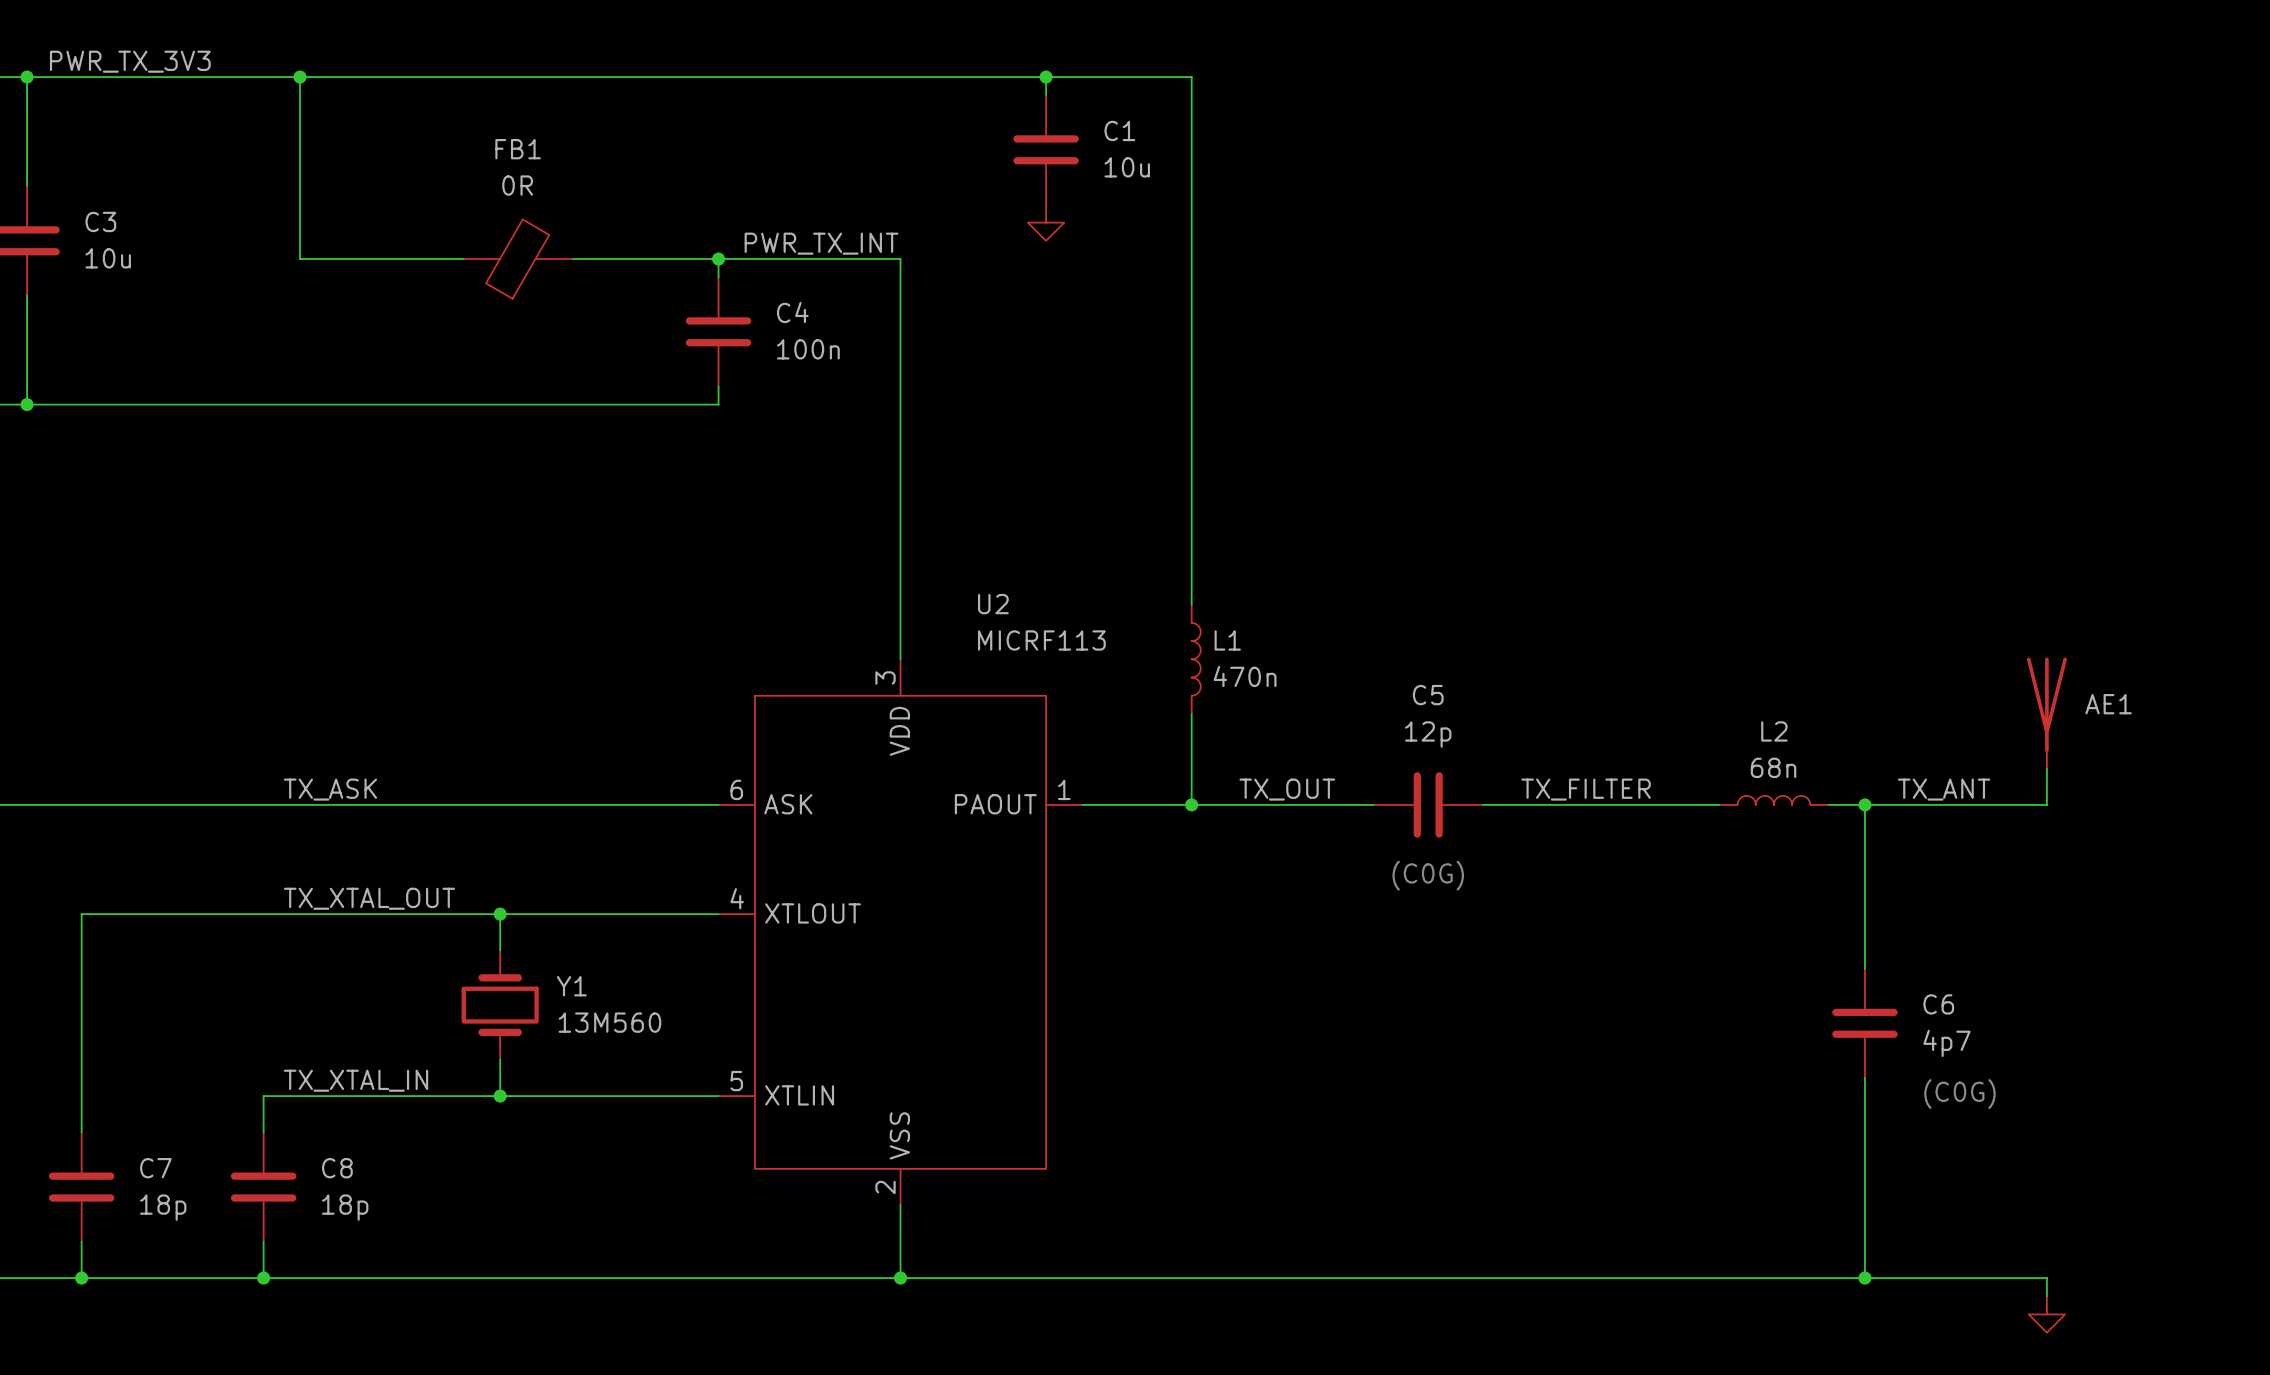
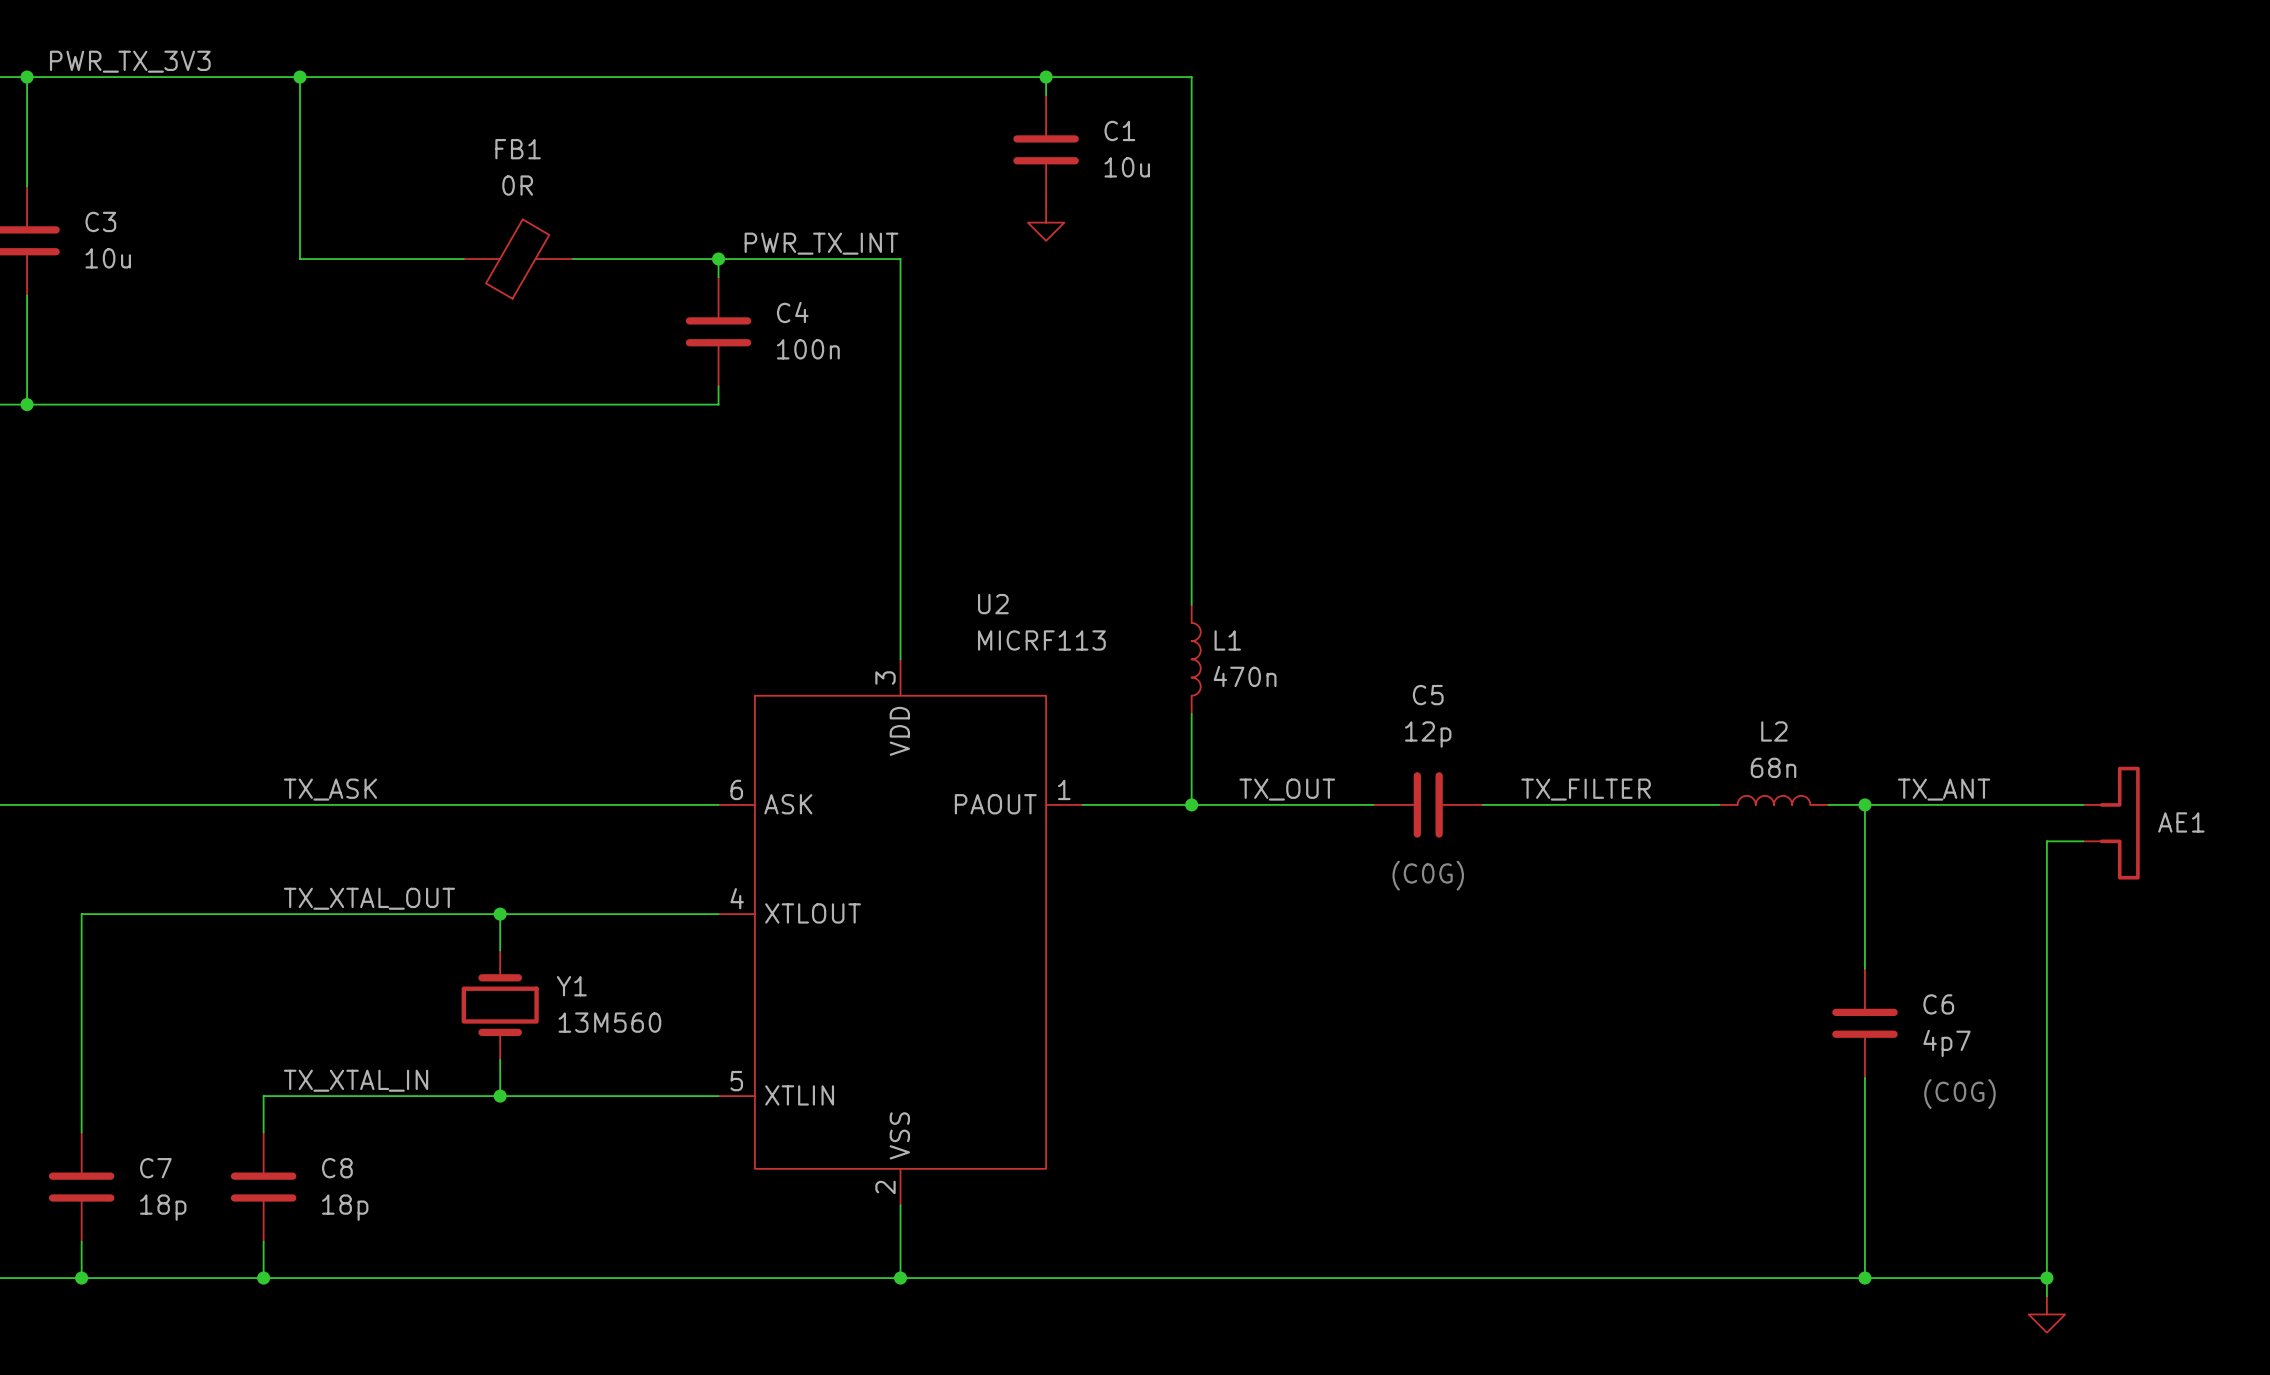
AE1 symbol: [2026, 657, 2067, 769] -> [2083, 766, 2140, 880]
wire: (2046, 768) (2046, 804) -> (2083, 804) (2046, 804)
wire: none -> (2083, 841) (2046, 841) (2046, 1278)
junction: none -> (2046, 1278)

